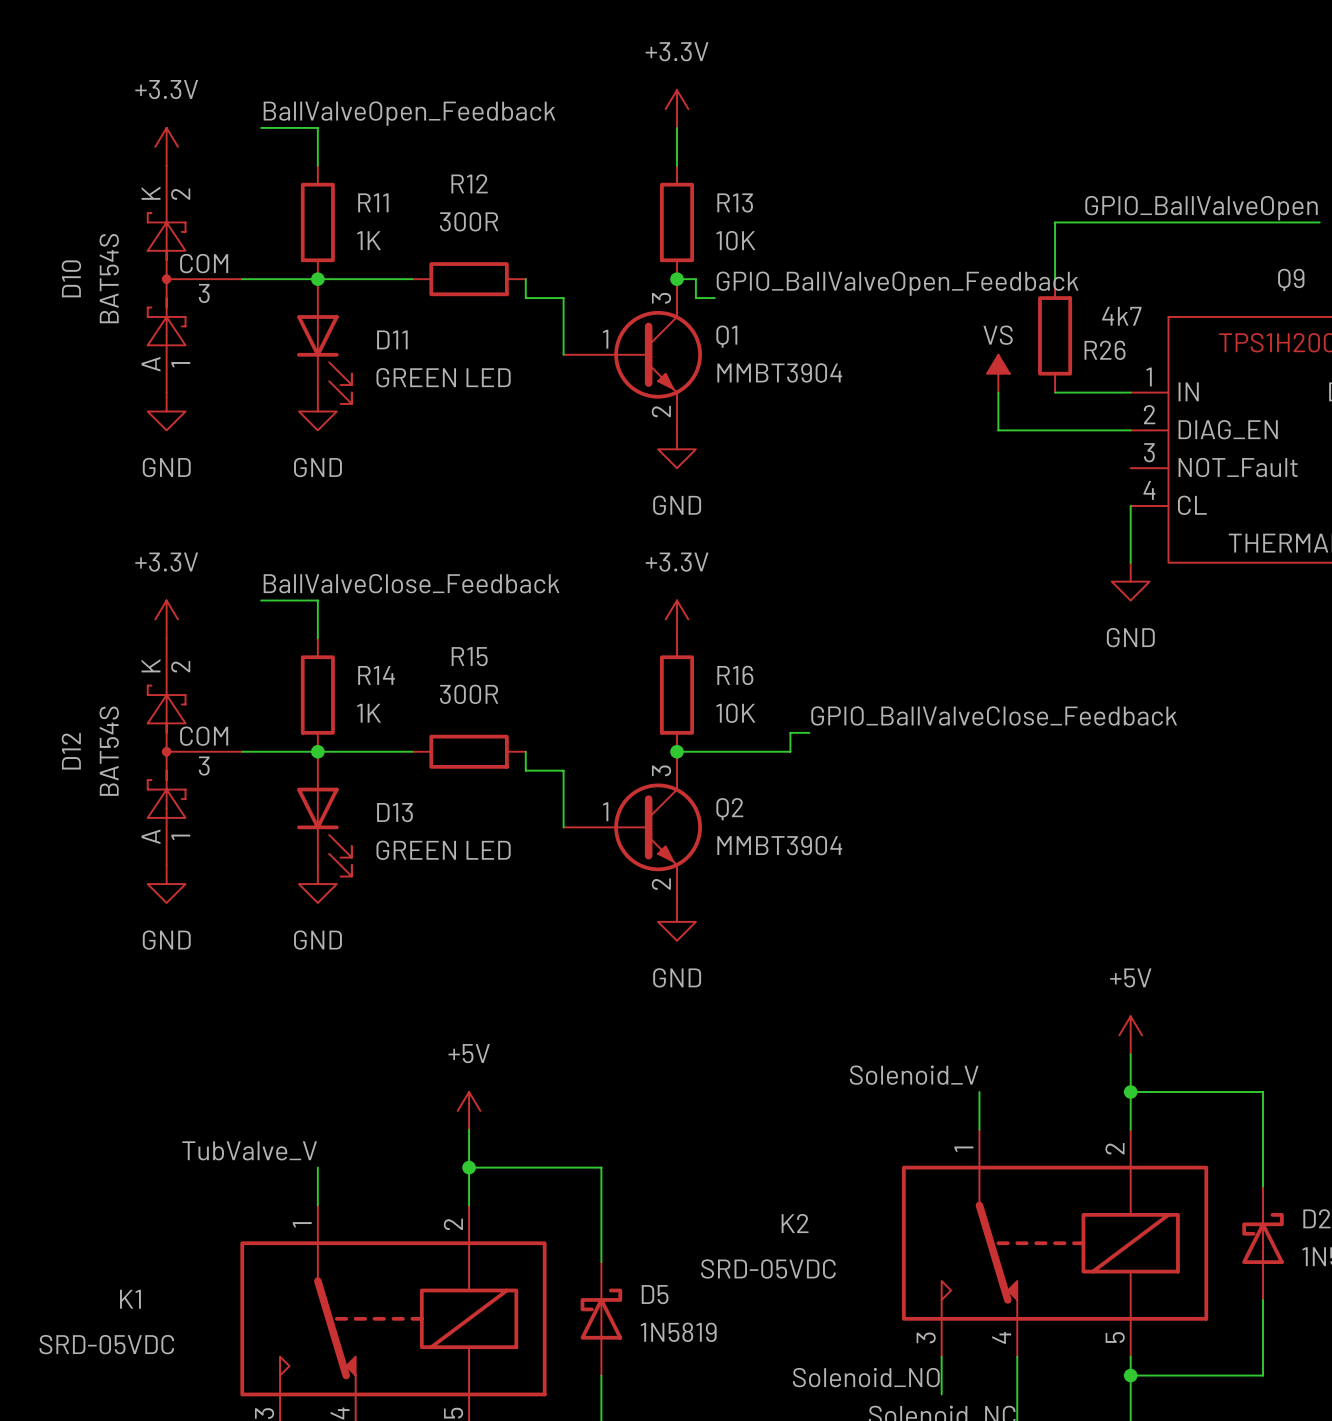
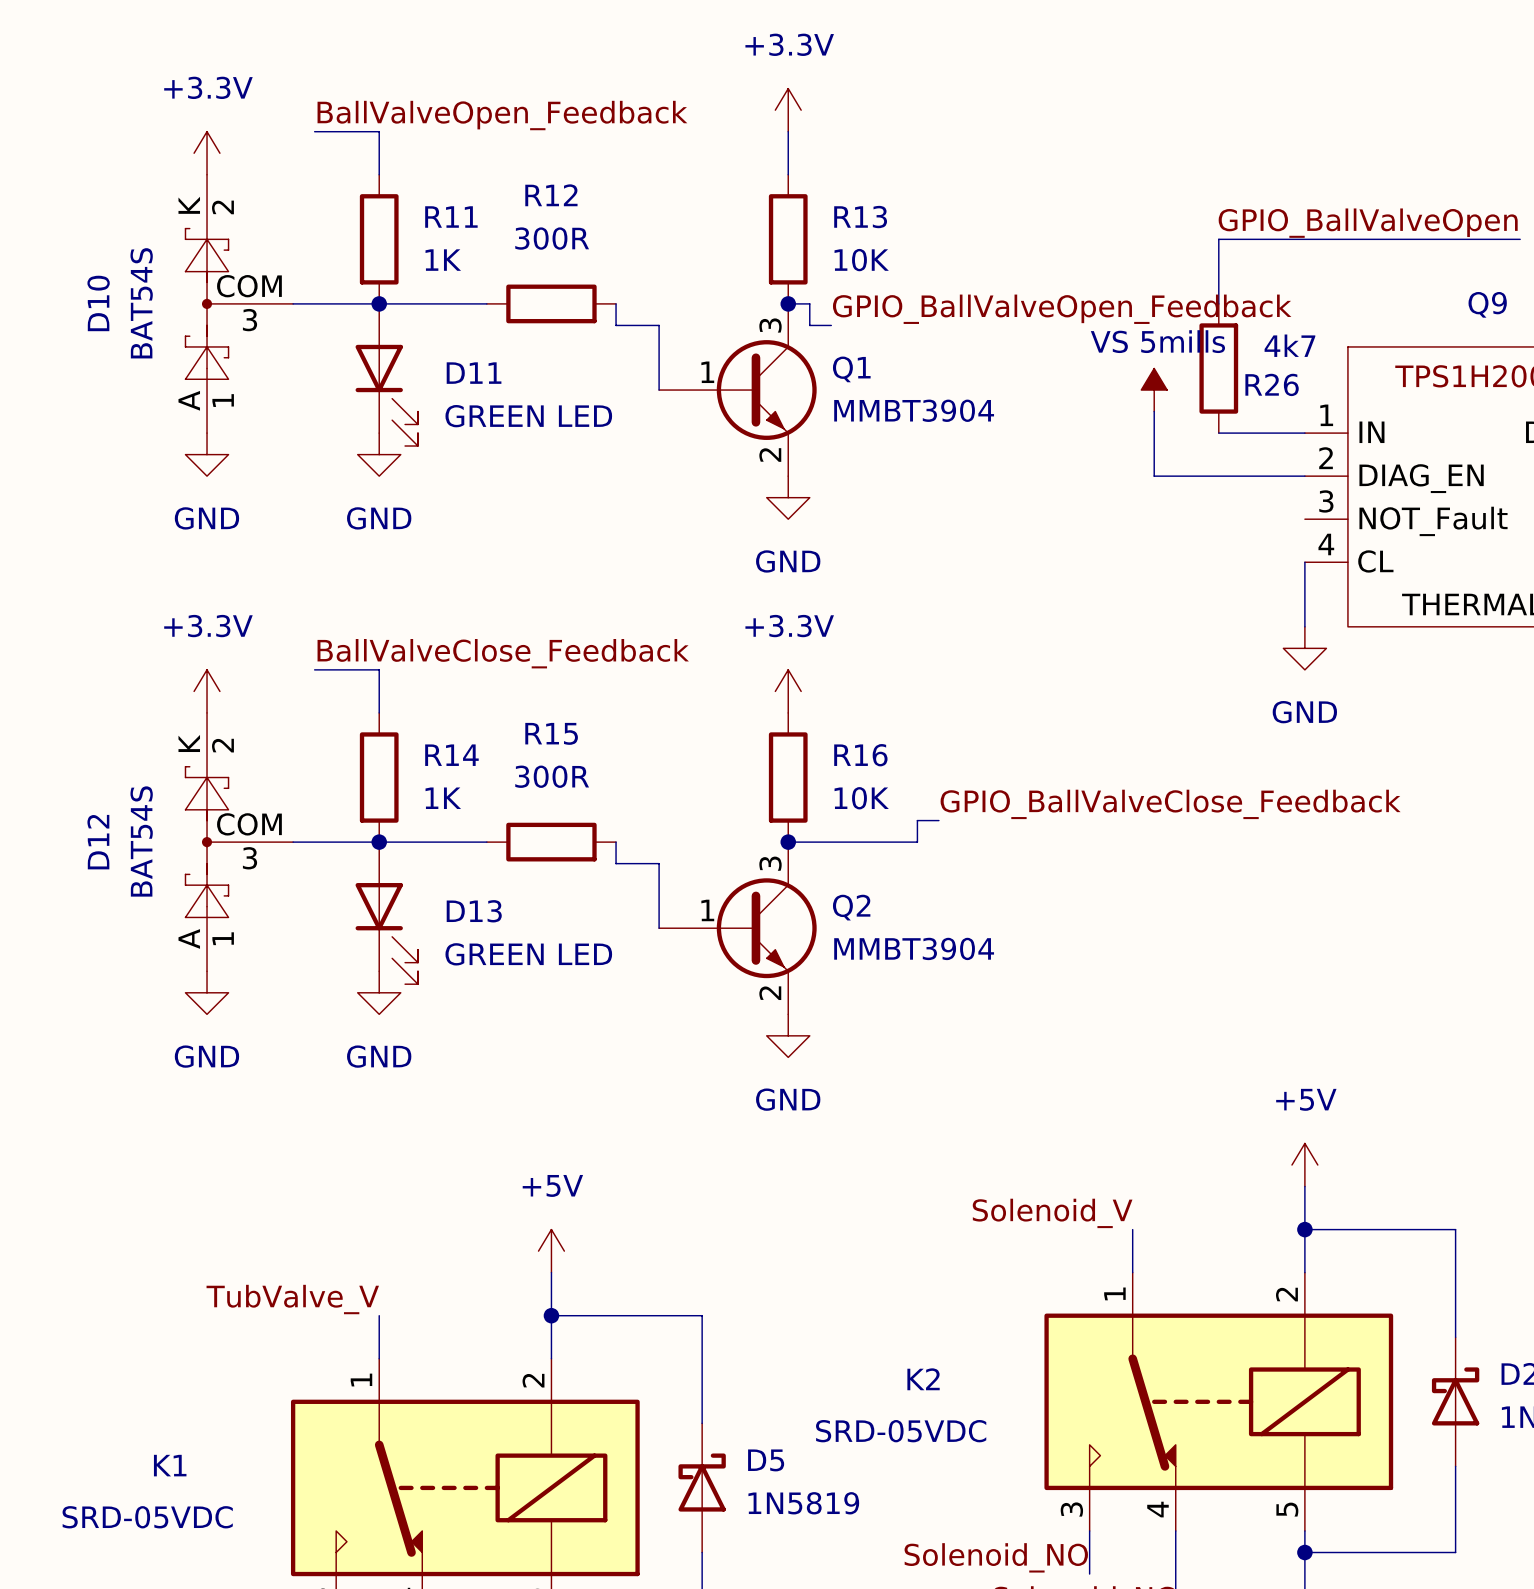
power symbol: none -> VS 5mills (1154, 390)
power symbol: VS (998, 373) -> none

